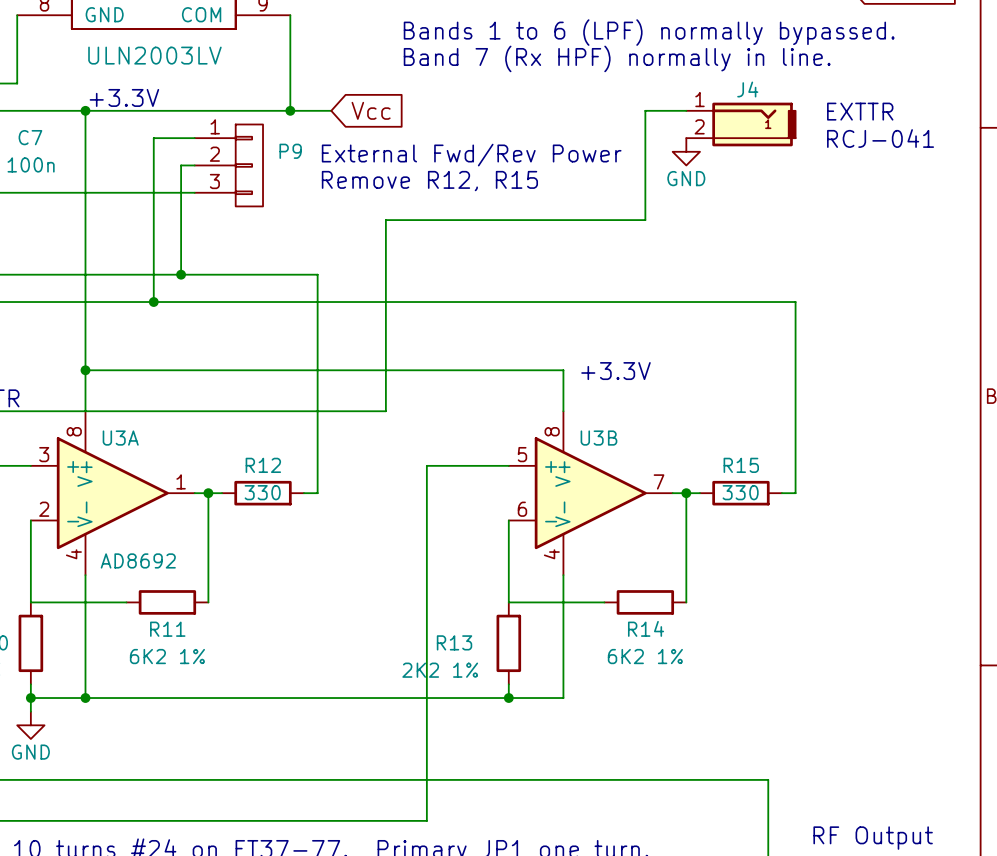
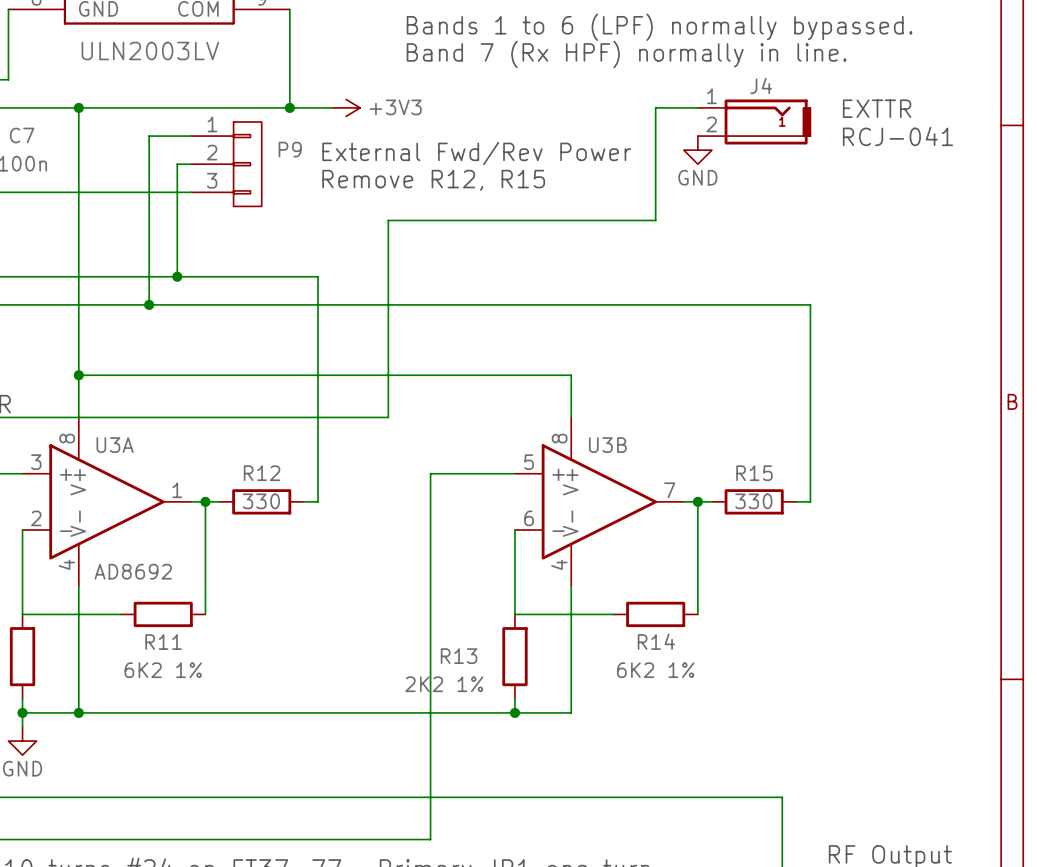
text: +3.3V (124, 97) -> none
power symbol: none -> +3V3 (346, 107)
global label: Vcc (371, 110) -> none
text: +3.3V (616, 371) -> none

